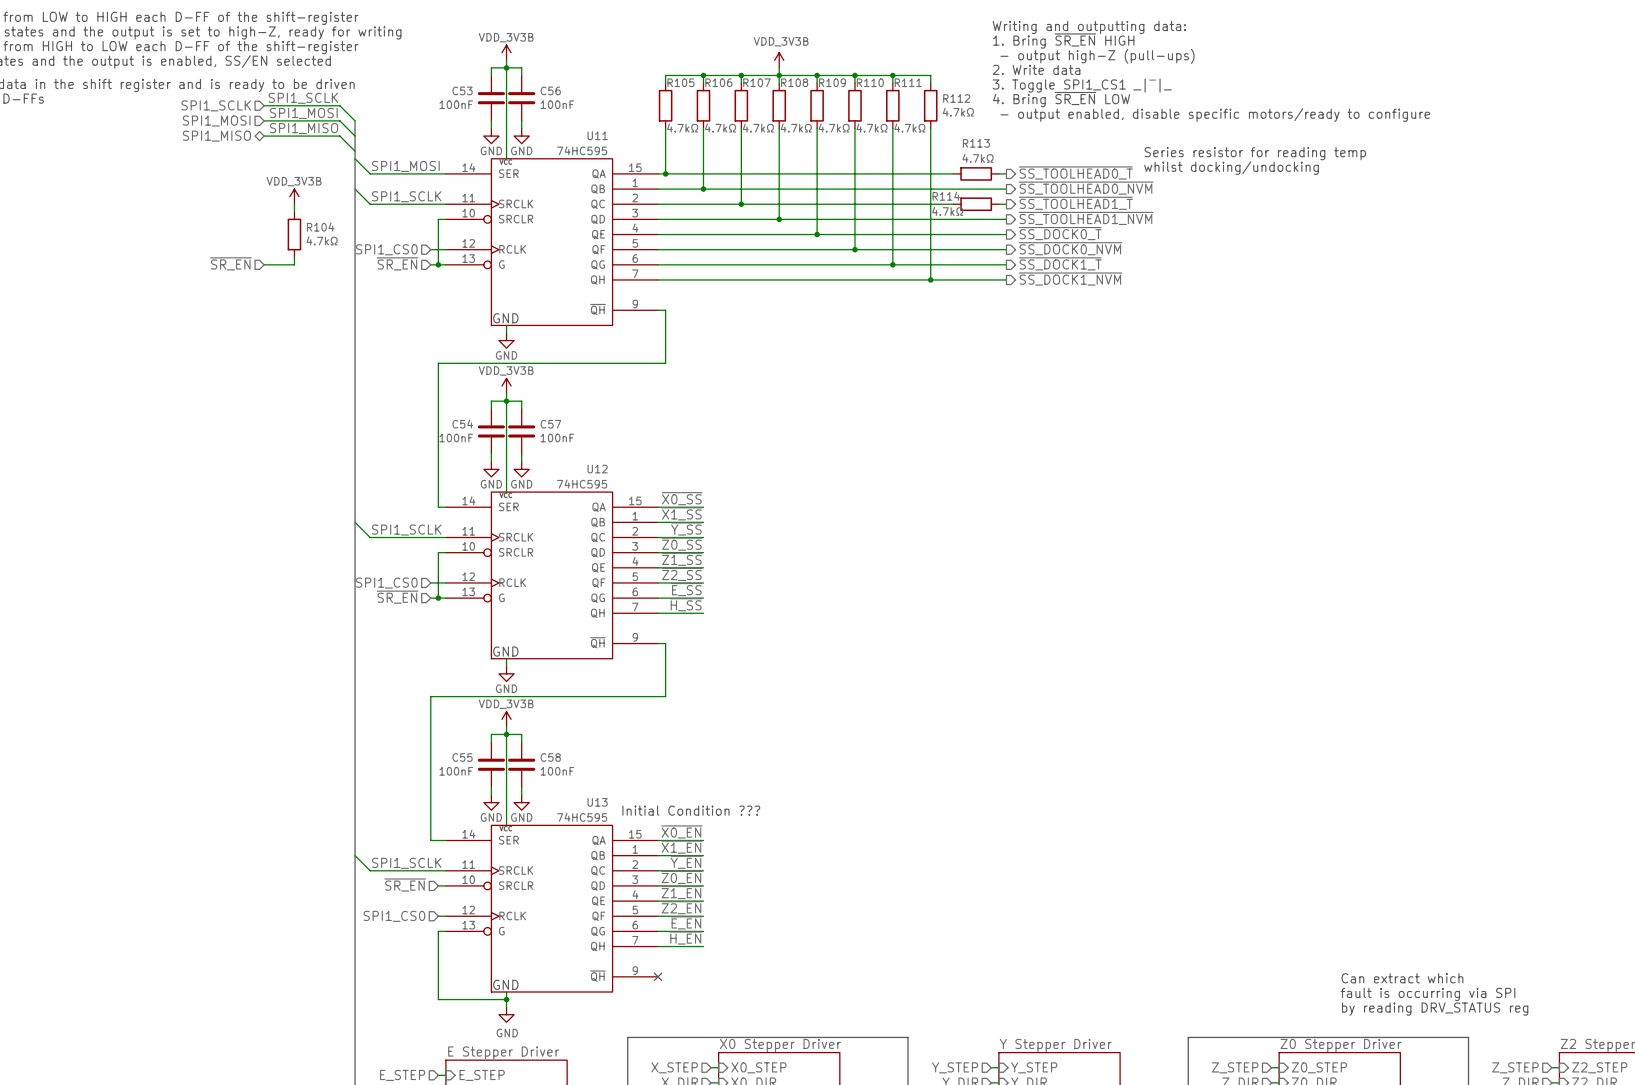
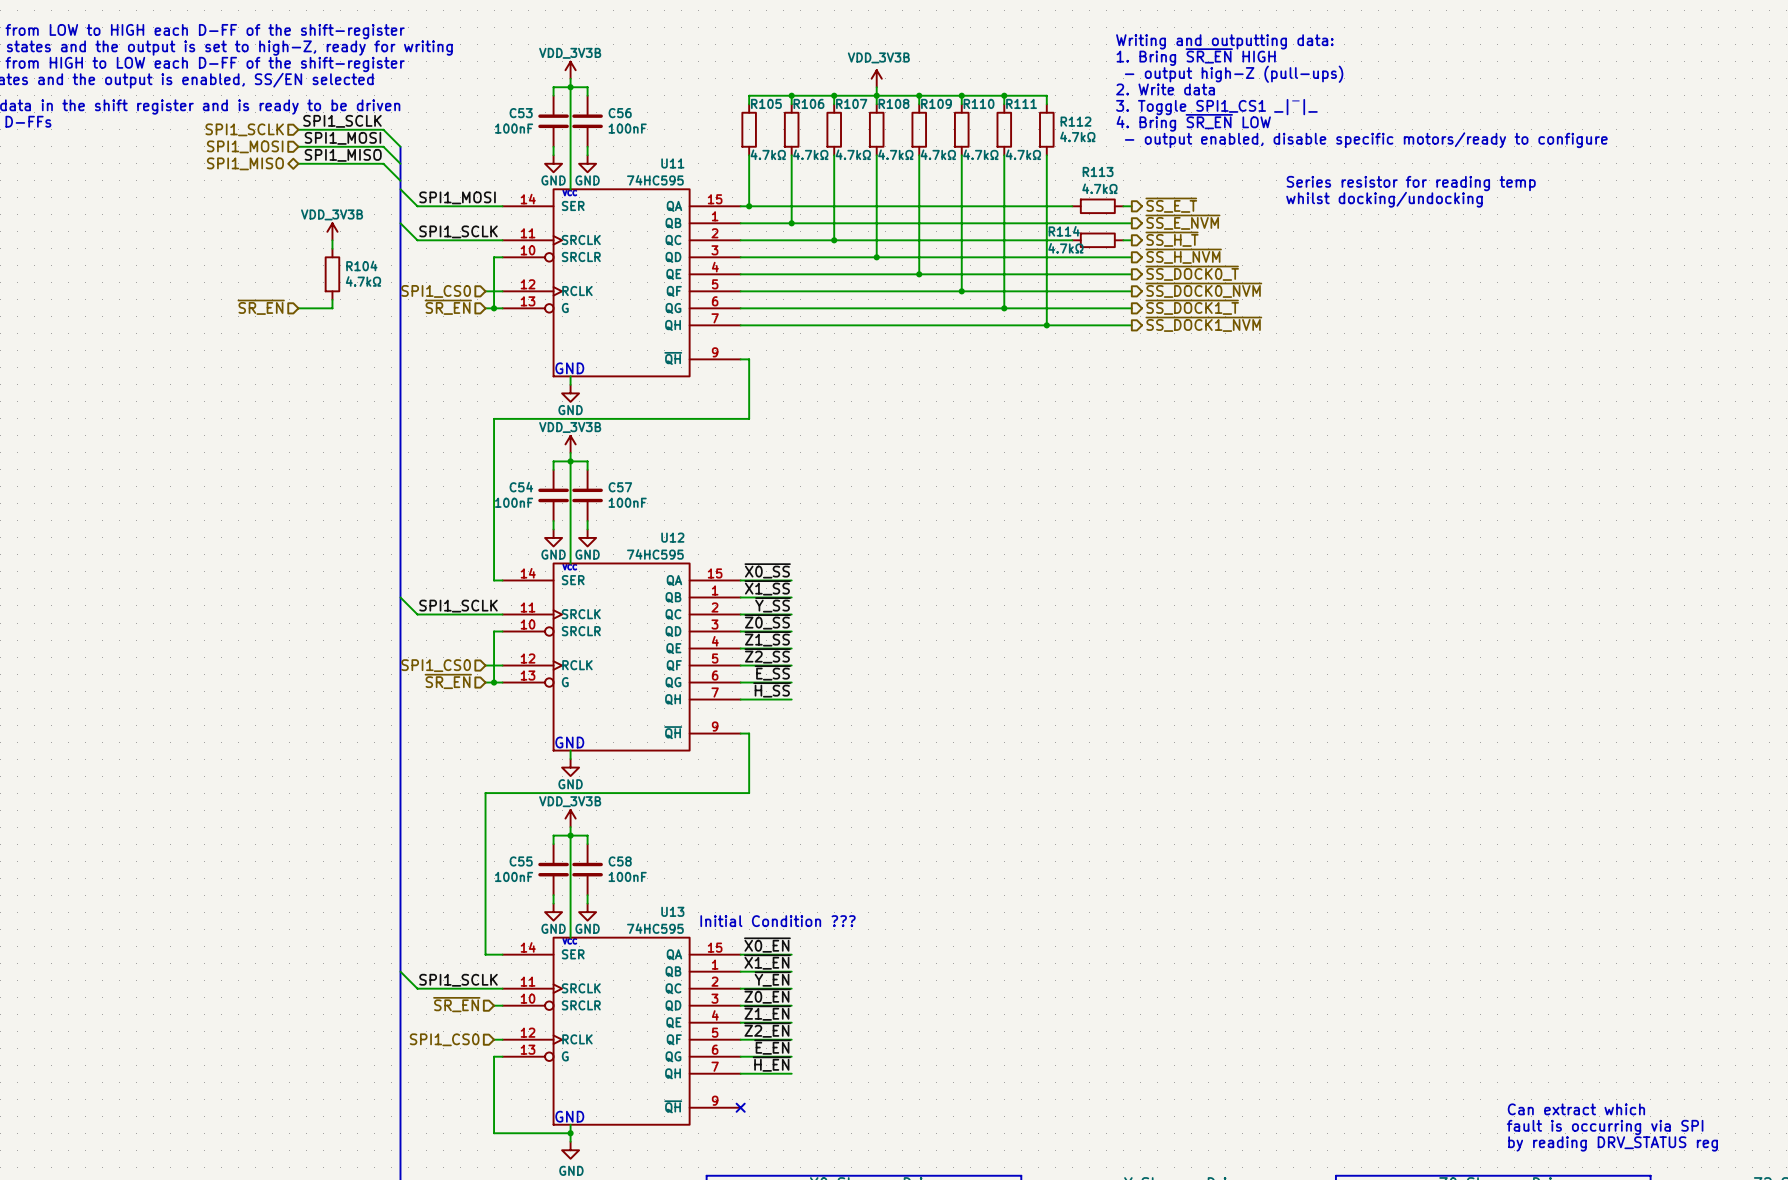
hierarchical label: ~{SS_TOOLHEAD0_T} (1075, 172) -> ~{SS_E_T} (1171, 205)
hierarchical label: ~{SS_TOOLHEAD0_NVM} (1086, 188) -> ~{SS_E_NVM} (1182, 222)
hierarchical label: ~{SS_TOOLHEAD1_T} (1075, 203) -> ~{SS_H_T} (1172, 239)
hierarchical label: ~{SS_TOOLHEAD1_NVM} (1086, 218) -> ~{SS_H_NVM} (1183, 256)

